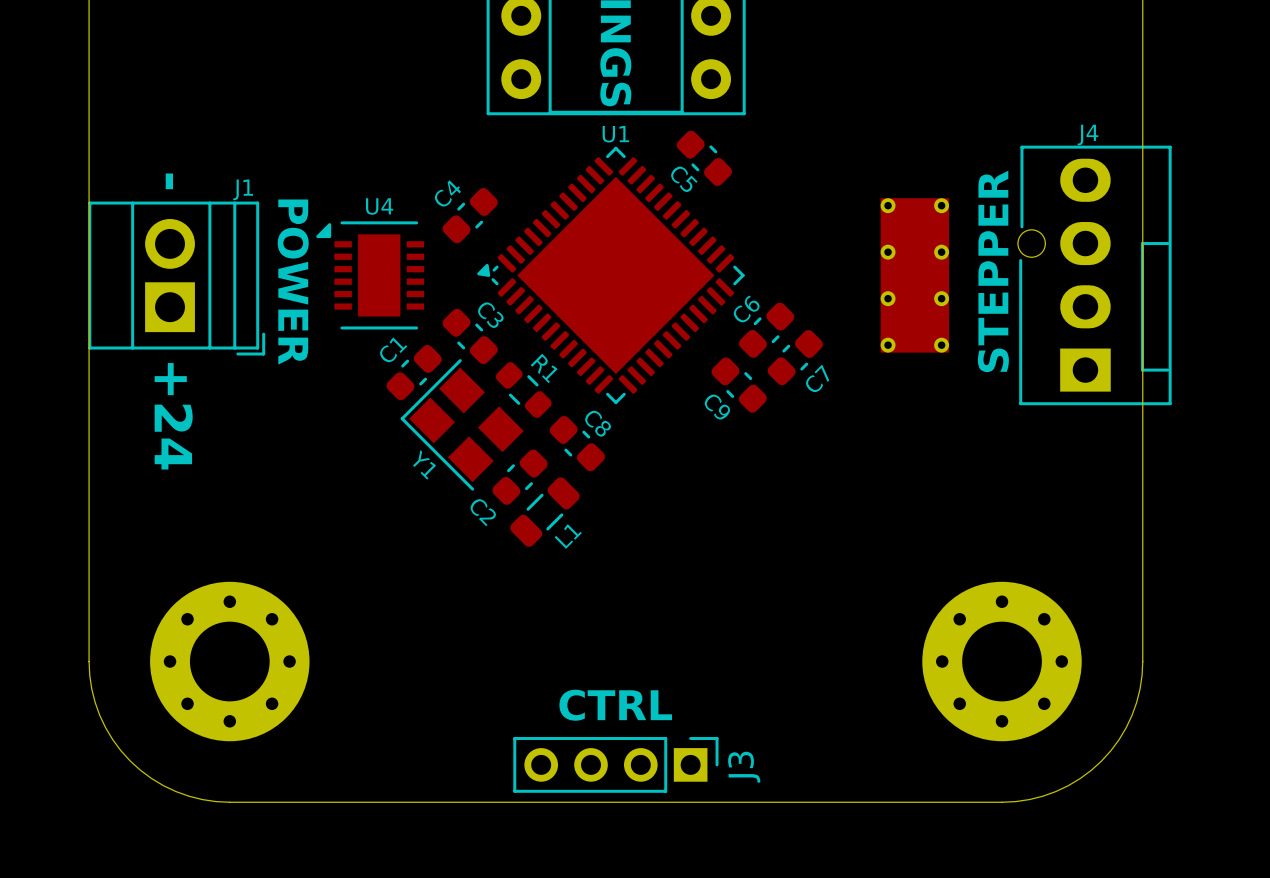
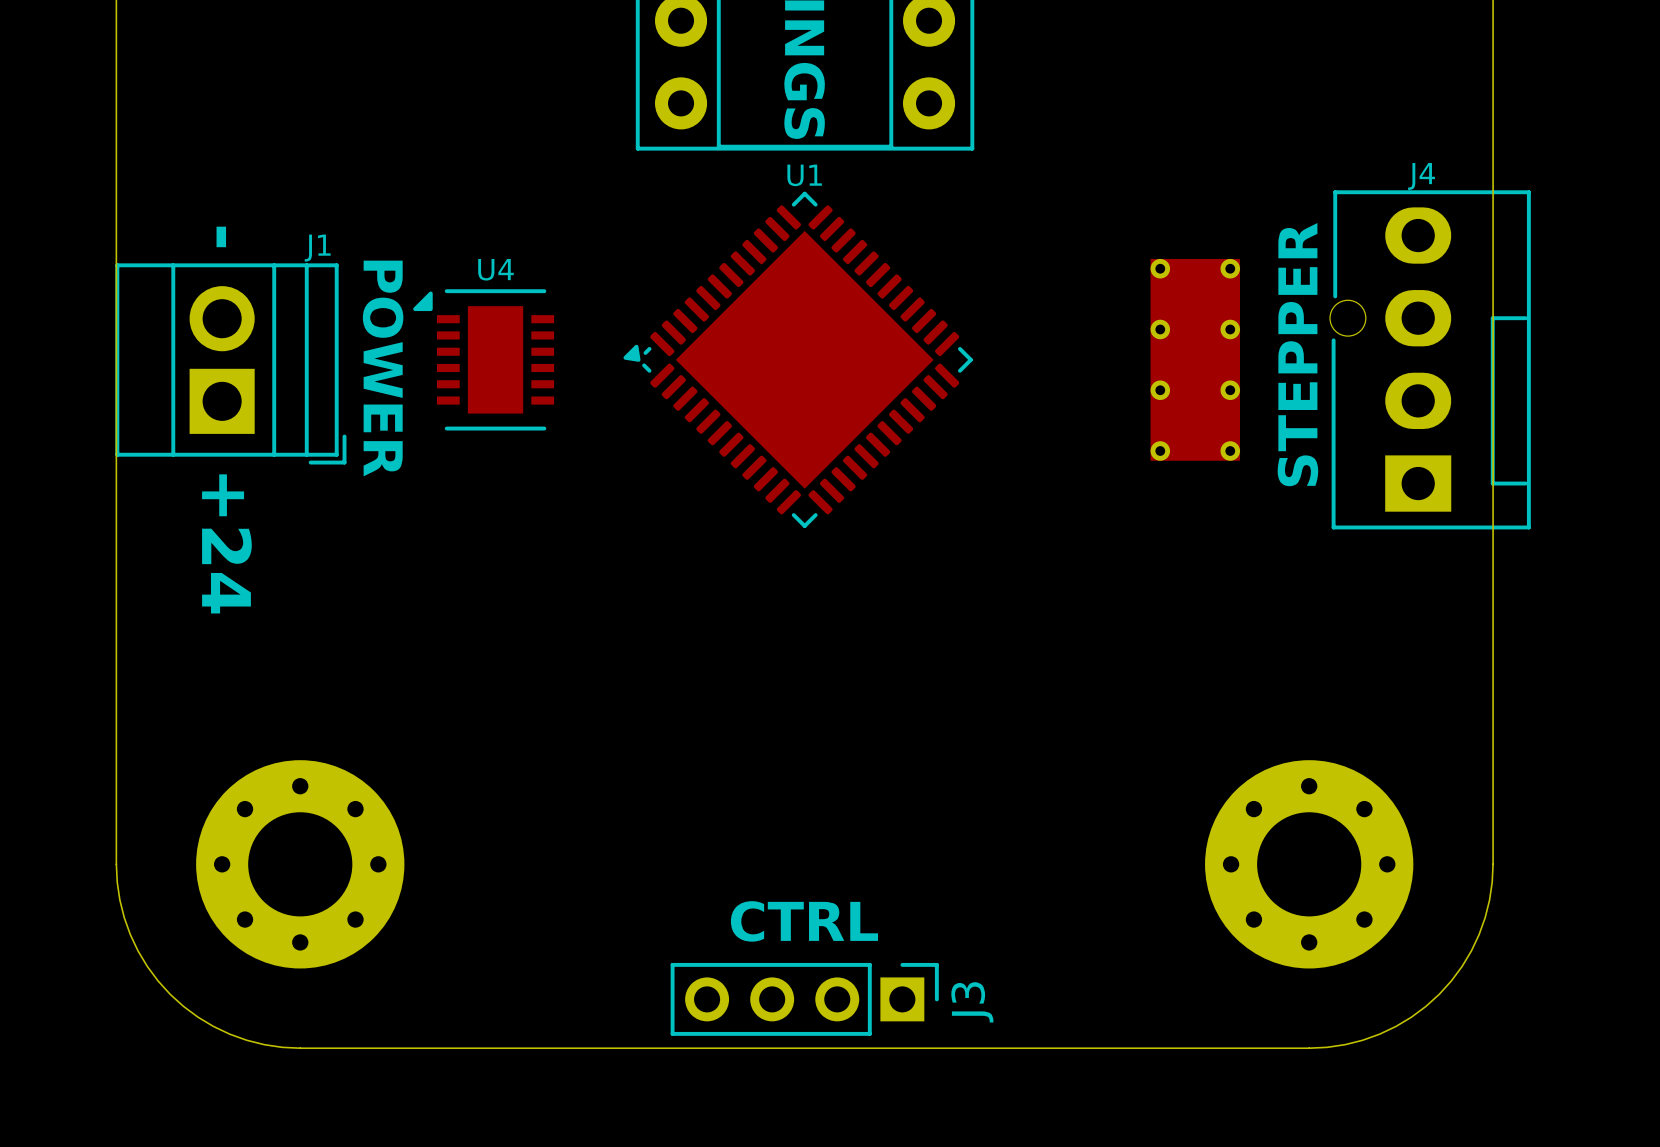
C5: (704, 158) -> none
C4: (470, 215) -> none
C6: (766, 330) -> none
C3: (470, 336) -> none
C7: (795, 357) -> none
C1: (414, 372) -> none
C9: (739, 385) -> none
R1: (523, 390) -> none
Y1: (462, 424) -> none
C8: (577, 443) -> none
C2: (520, 477) -> none
L1: (544, 512) -> none

